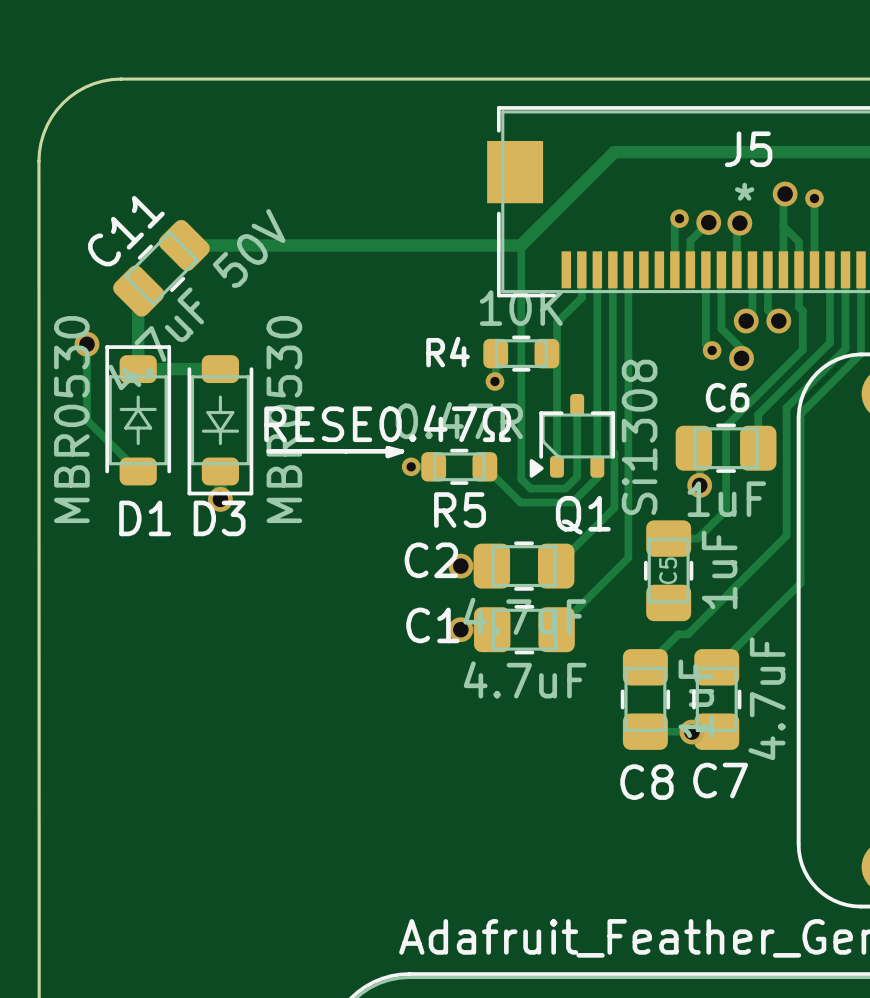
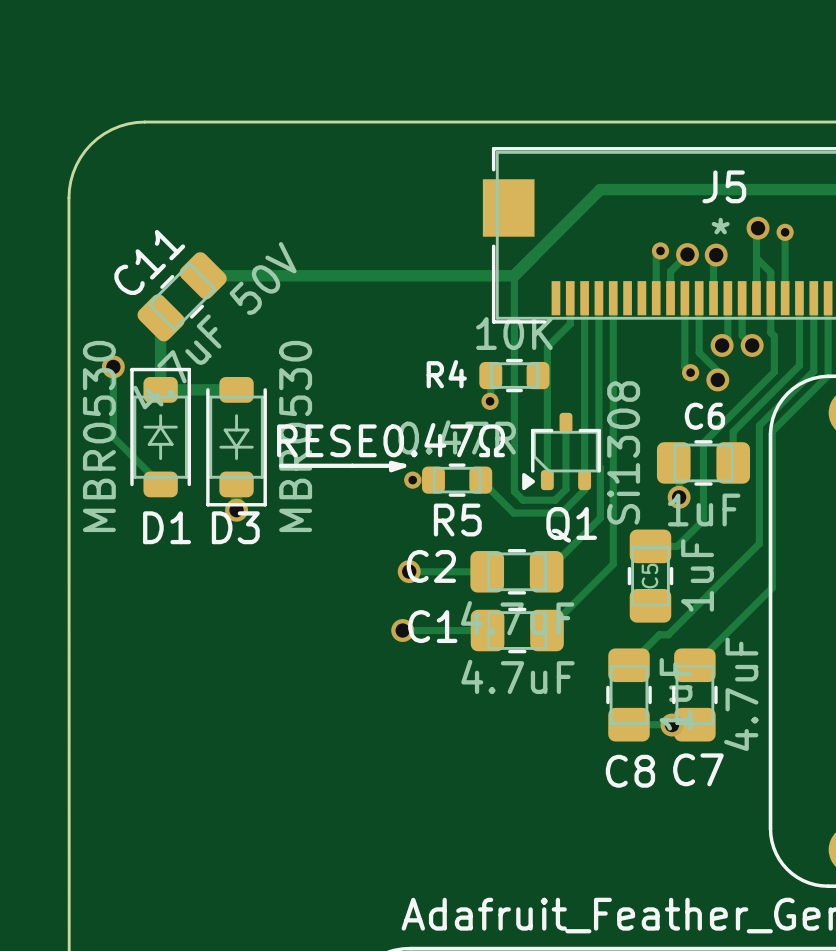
via: none -> (409, 571)
track: none -> (409, 571) (458, 571)
via: (460, 566) -> none
track: none -> (402, 630) (458, 630)
via: none -> (402, 630)
via: (460, 629) -> none

